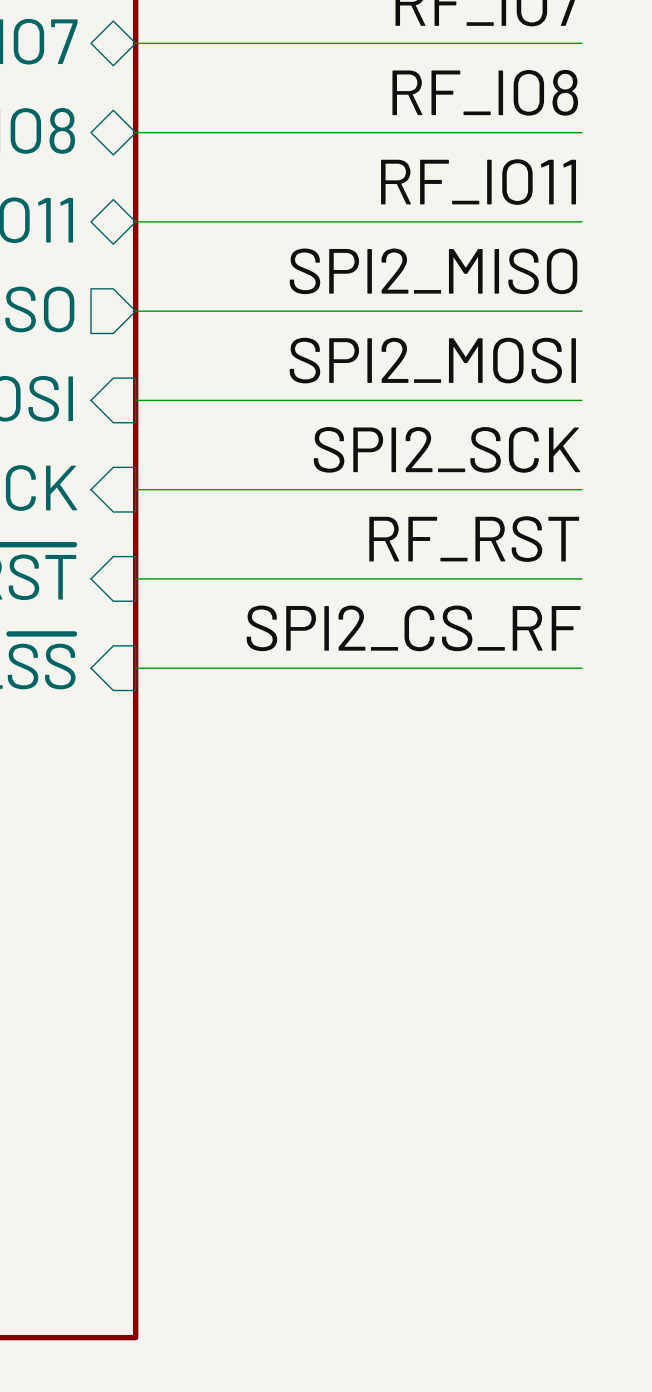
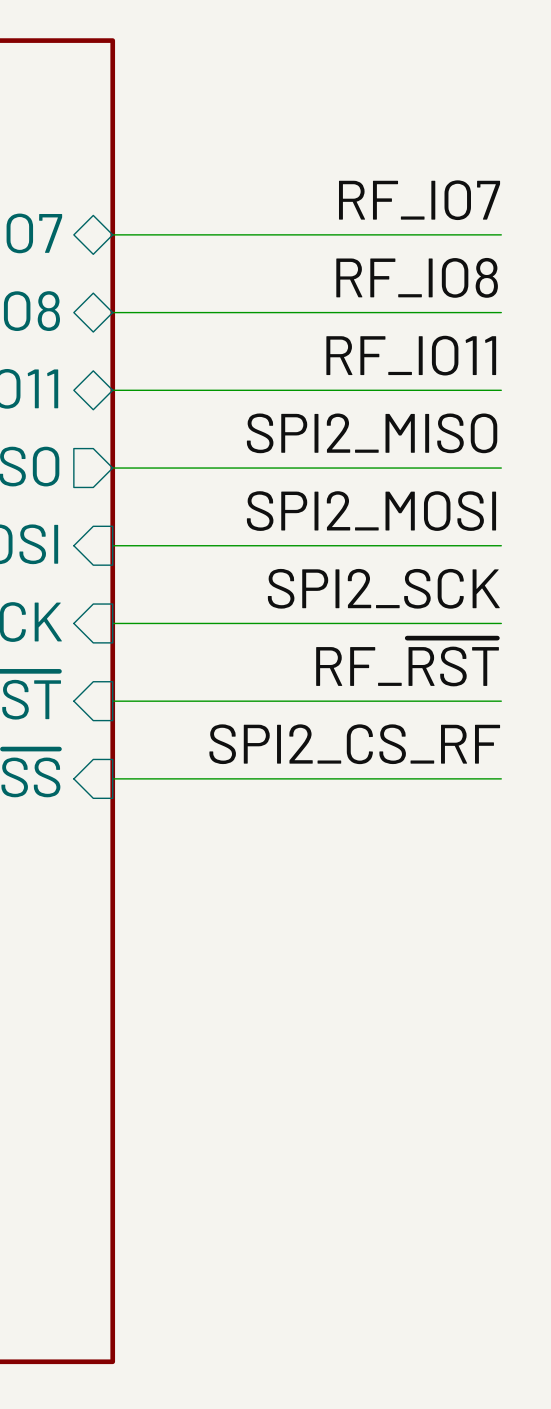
label: RF_RST (474, 539) -> RF_~{RST} (407, 662)

